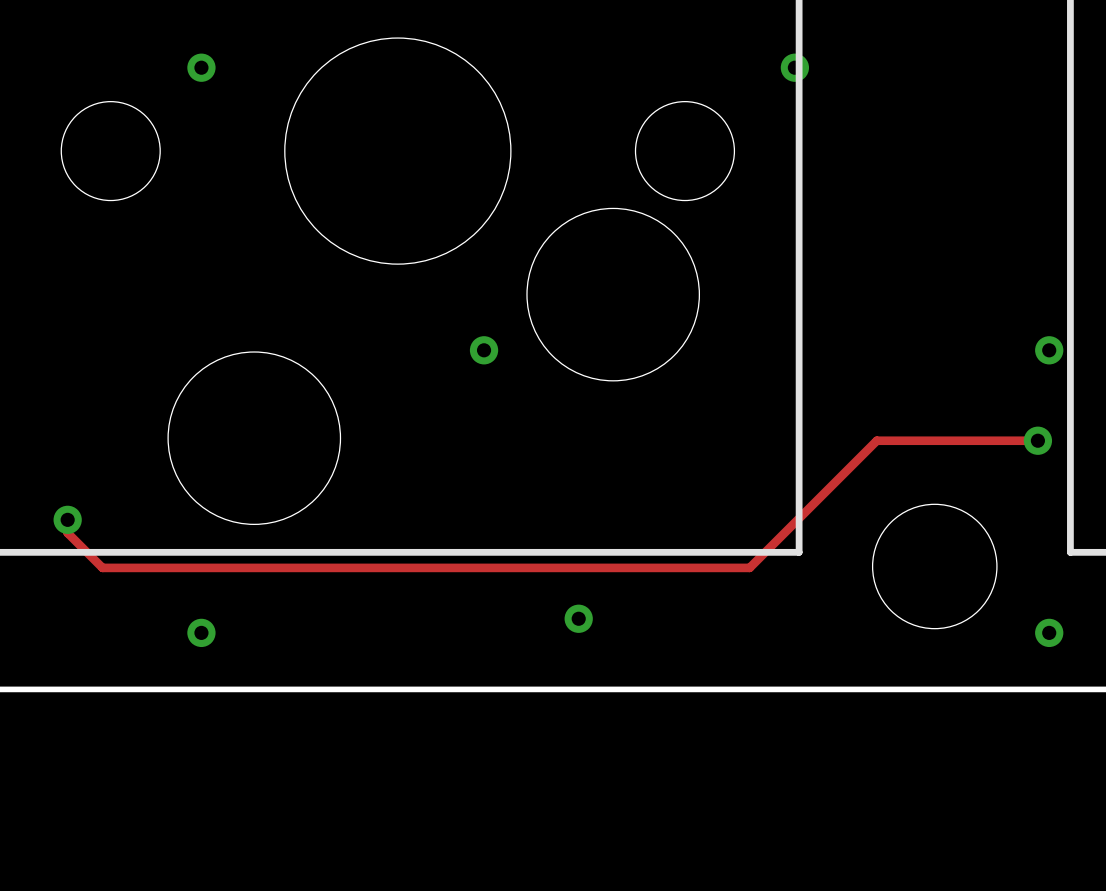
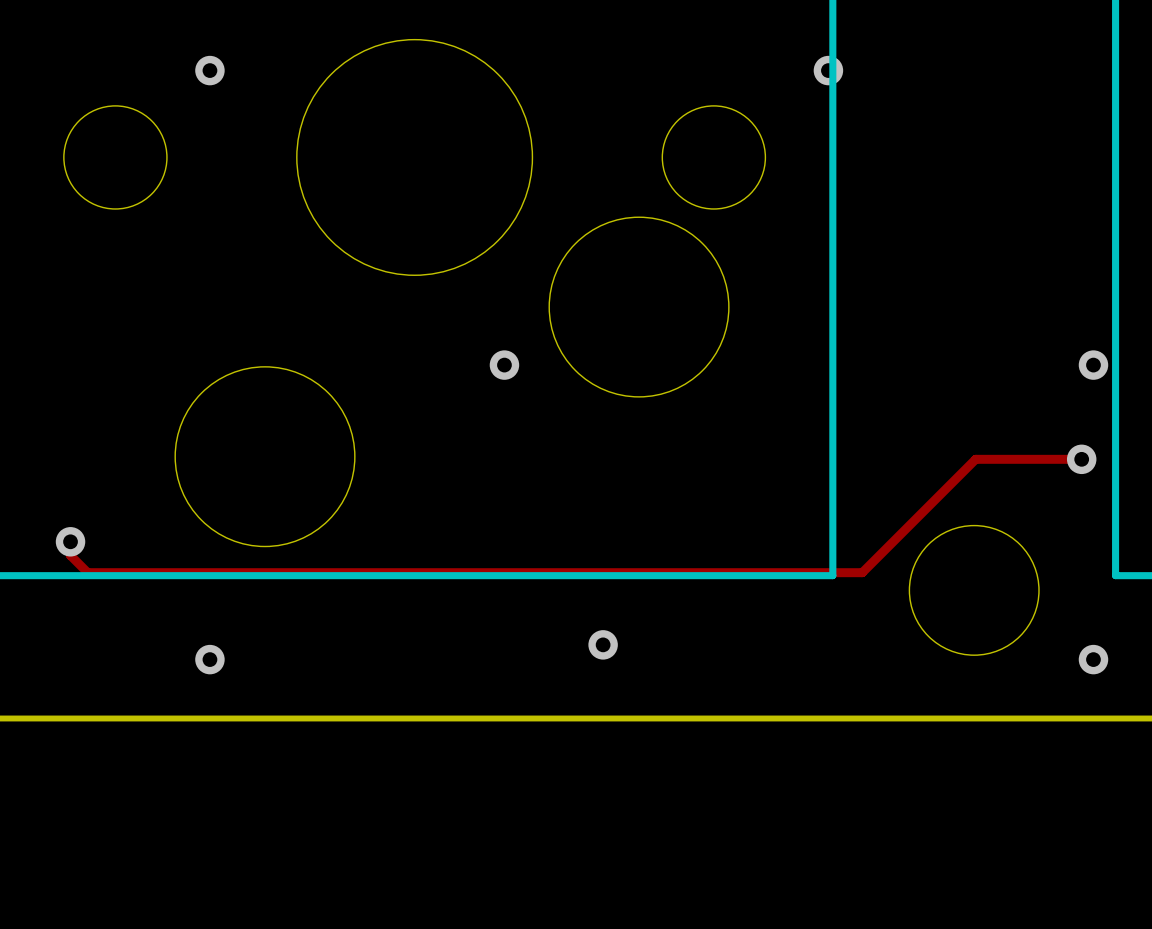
track: (936, 440) (876, 440) (749, 567) (102, 567) (84, 549) -> (975, 459) (862, 572) (87, 572)

